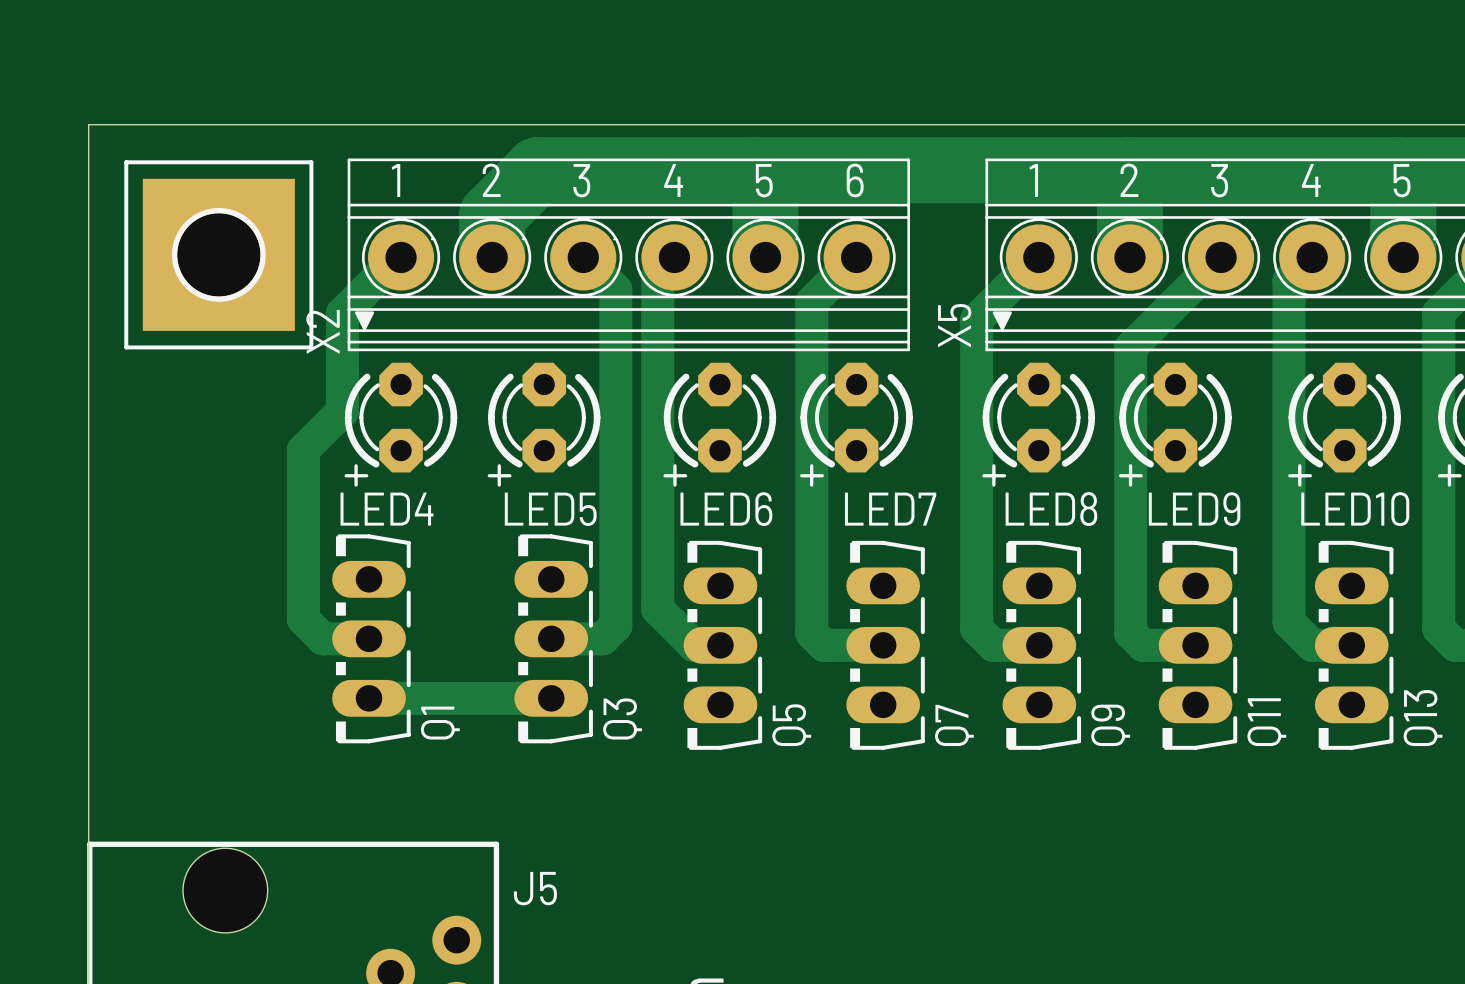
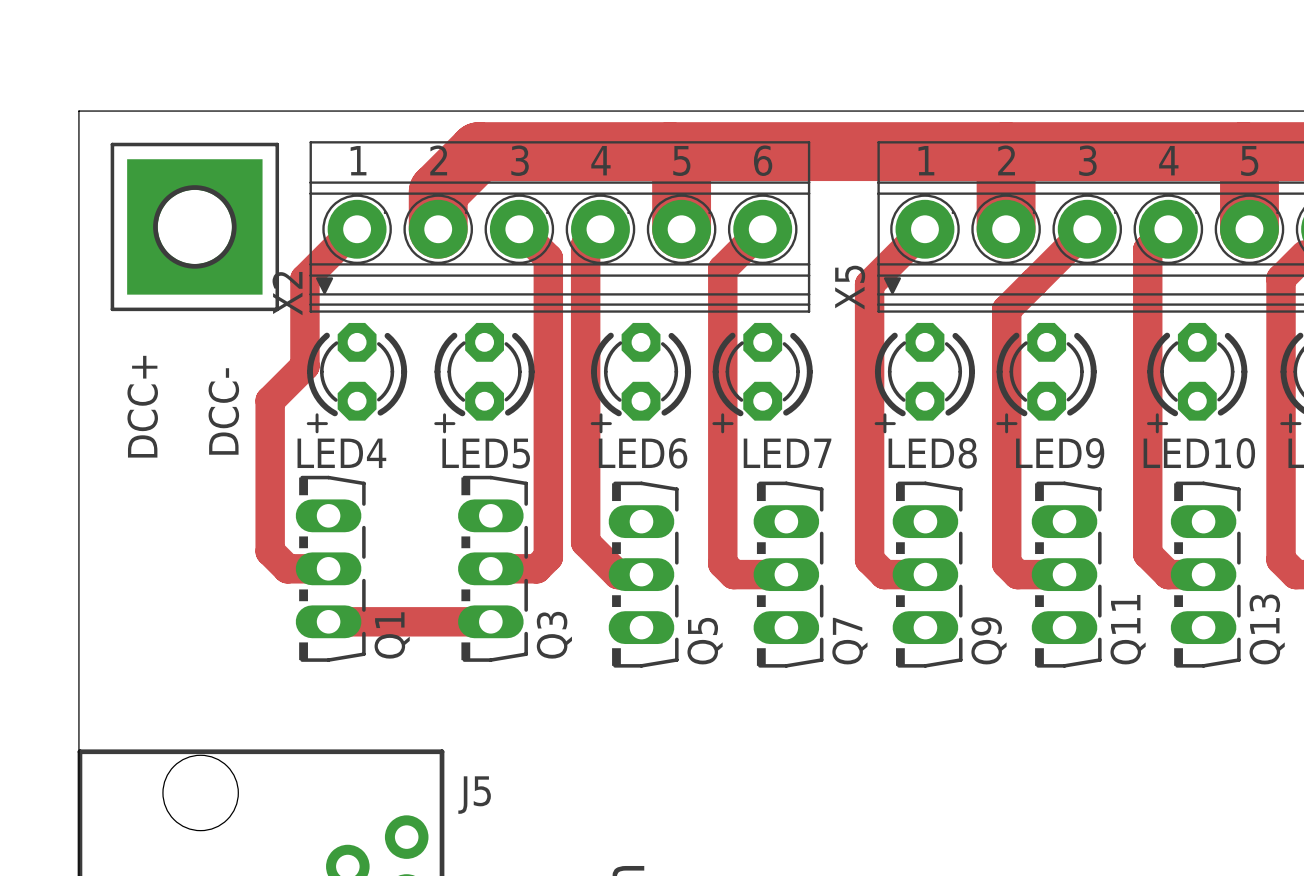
text: none -> DCC+ (142, 406)
text: none -> DCC- (223, 411)

